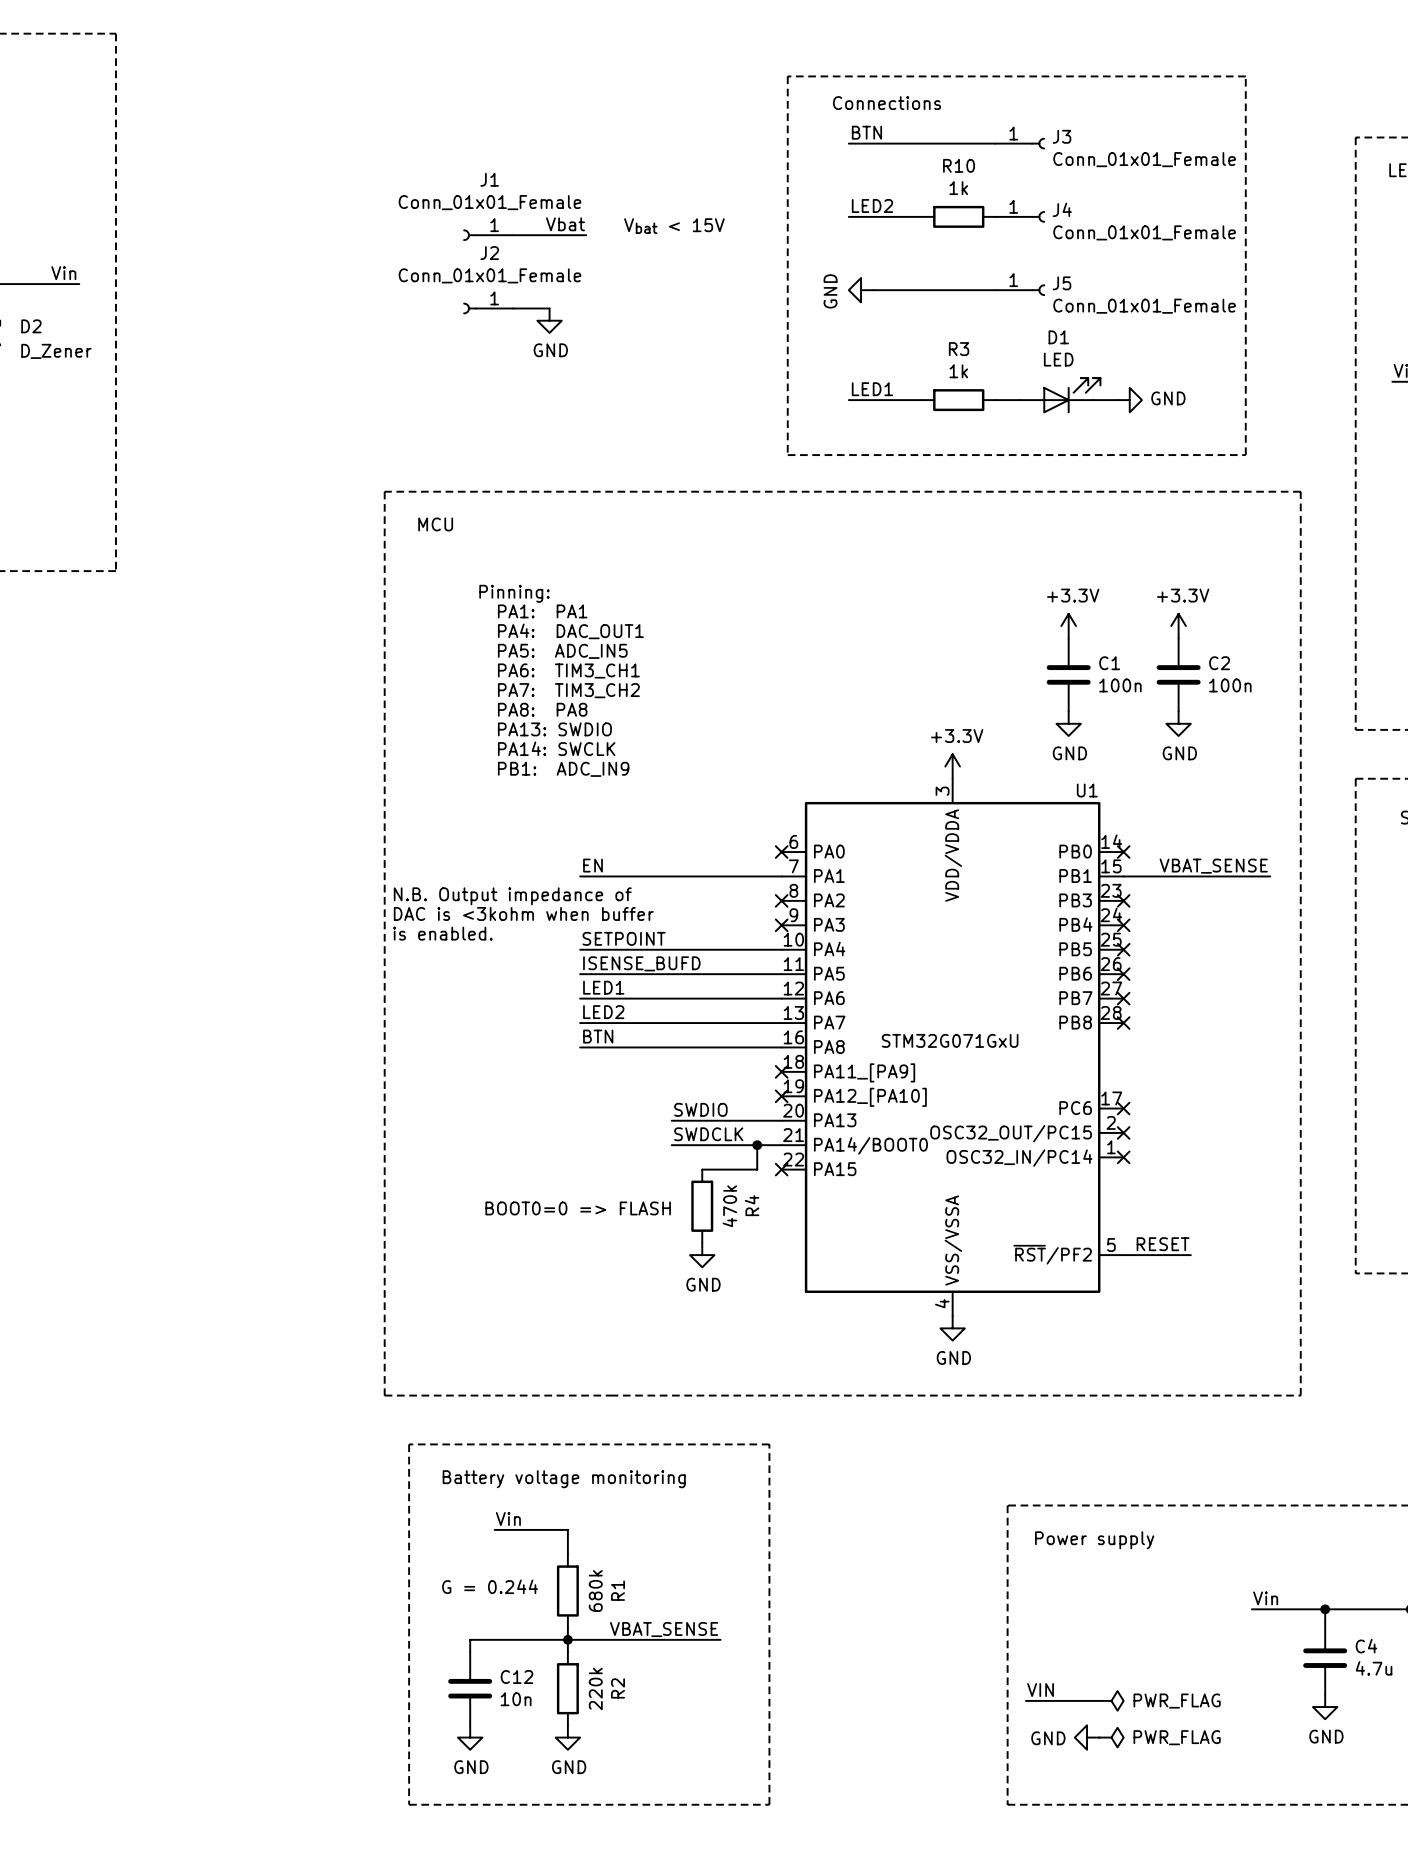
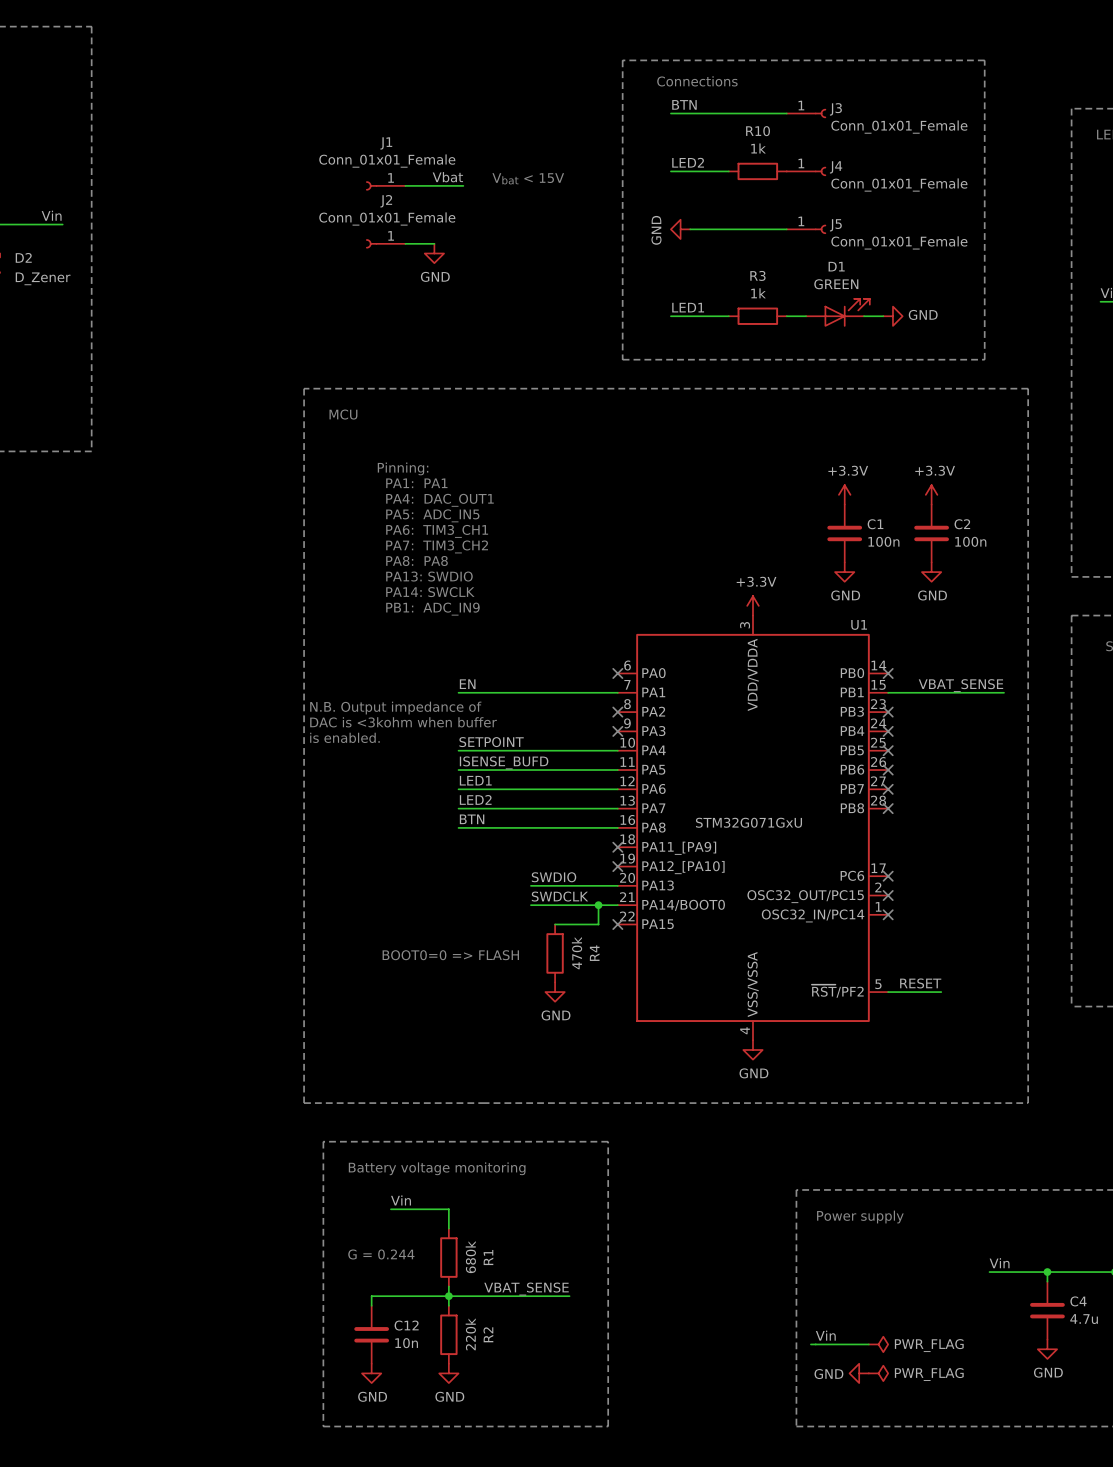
D1 value: LED (1058, 359) -> GREEN (836, 284)
label: VIN (1040, 1690) -> Vin (825, 1335)

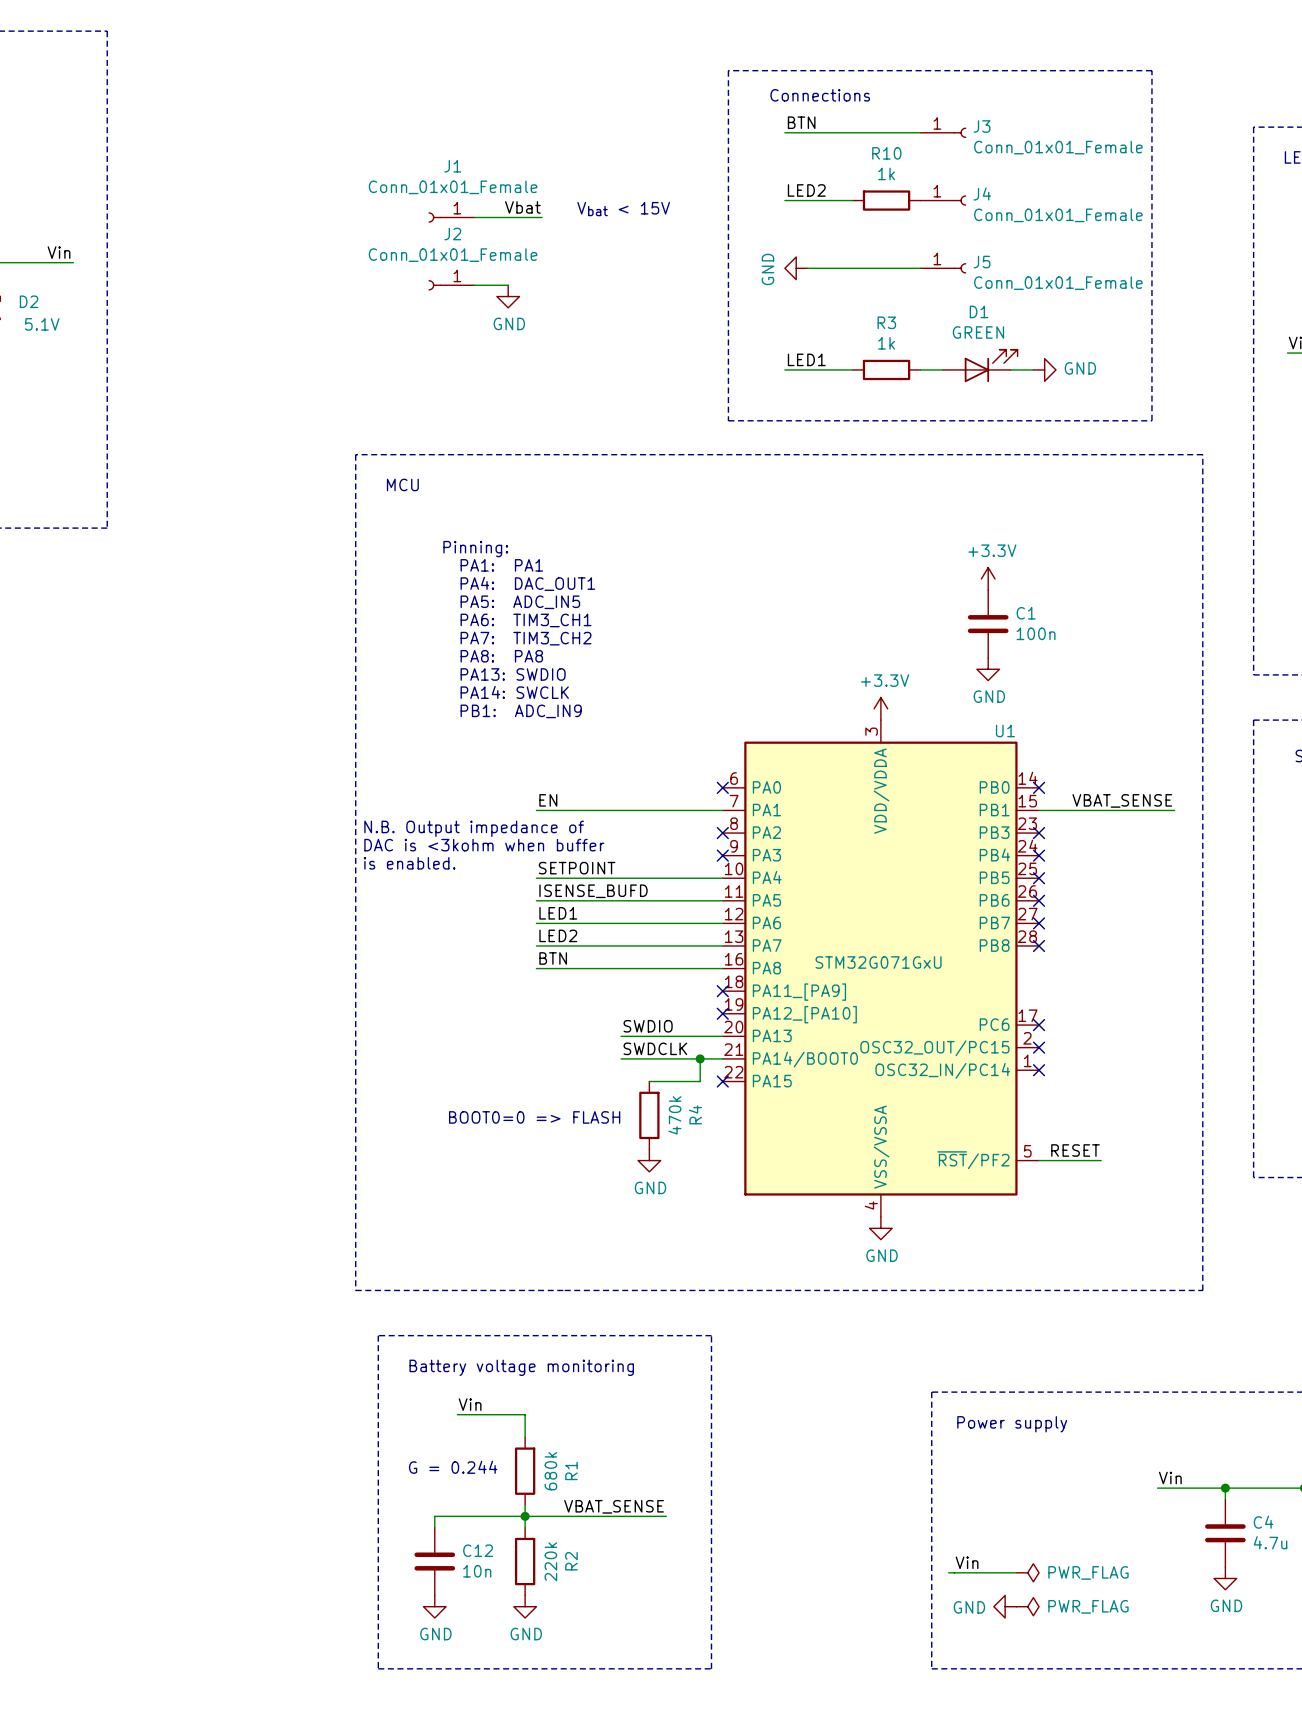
D2 value: D_Zener (43, 278) -> 5.1V (42, 324)
power symbol: +3.3V (931, 494) -> none
C2: 100n (931, 533) -> none
power symbol: GND (931, 572) -> none

